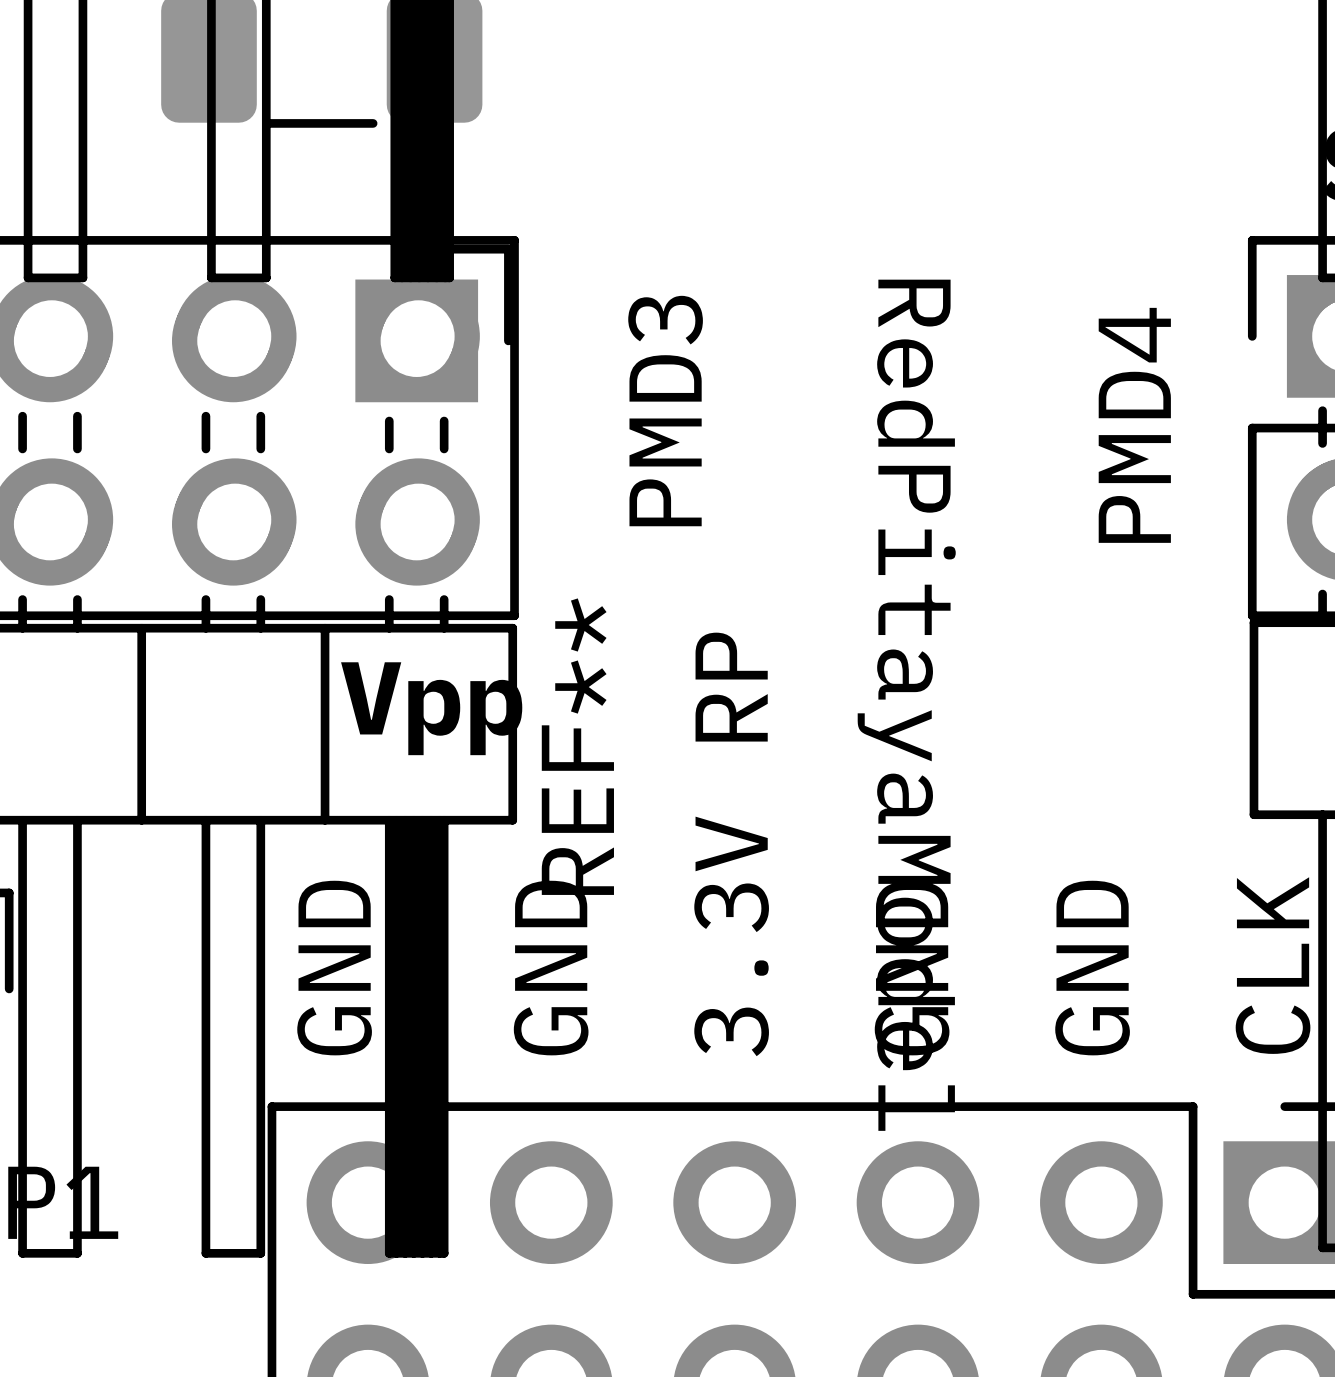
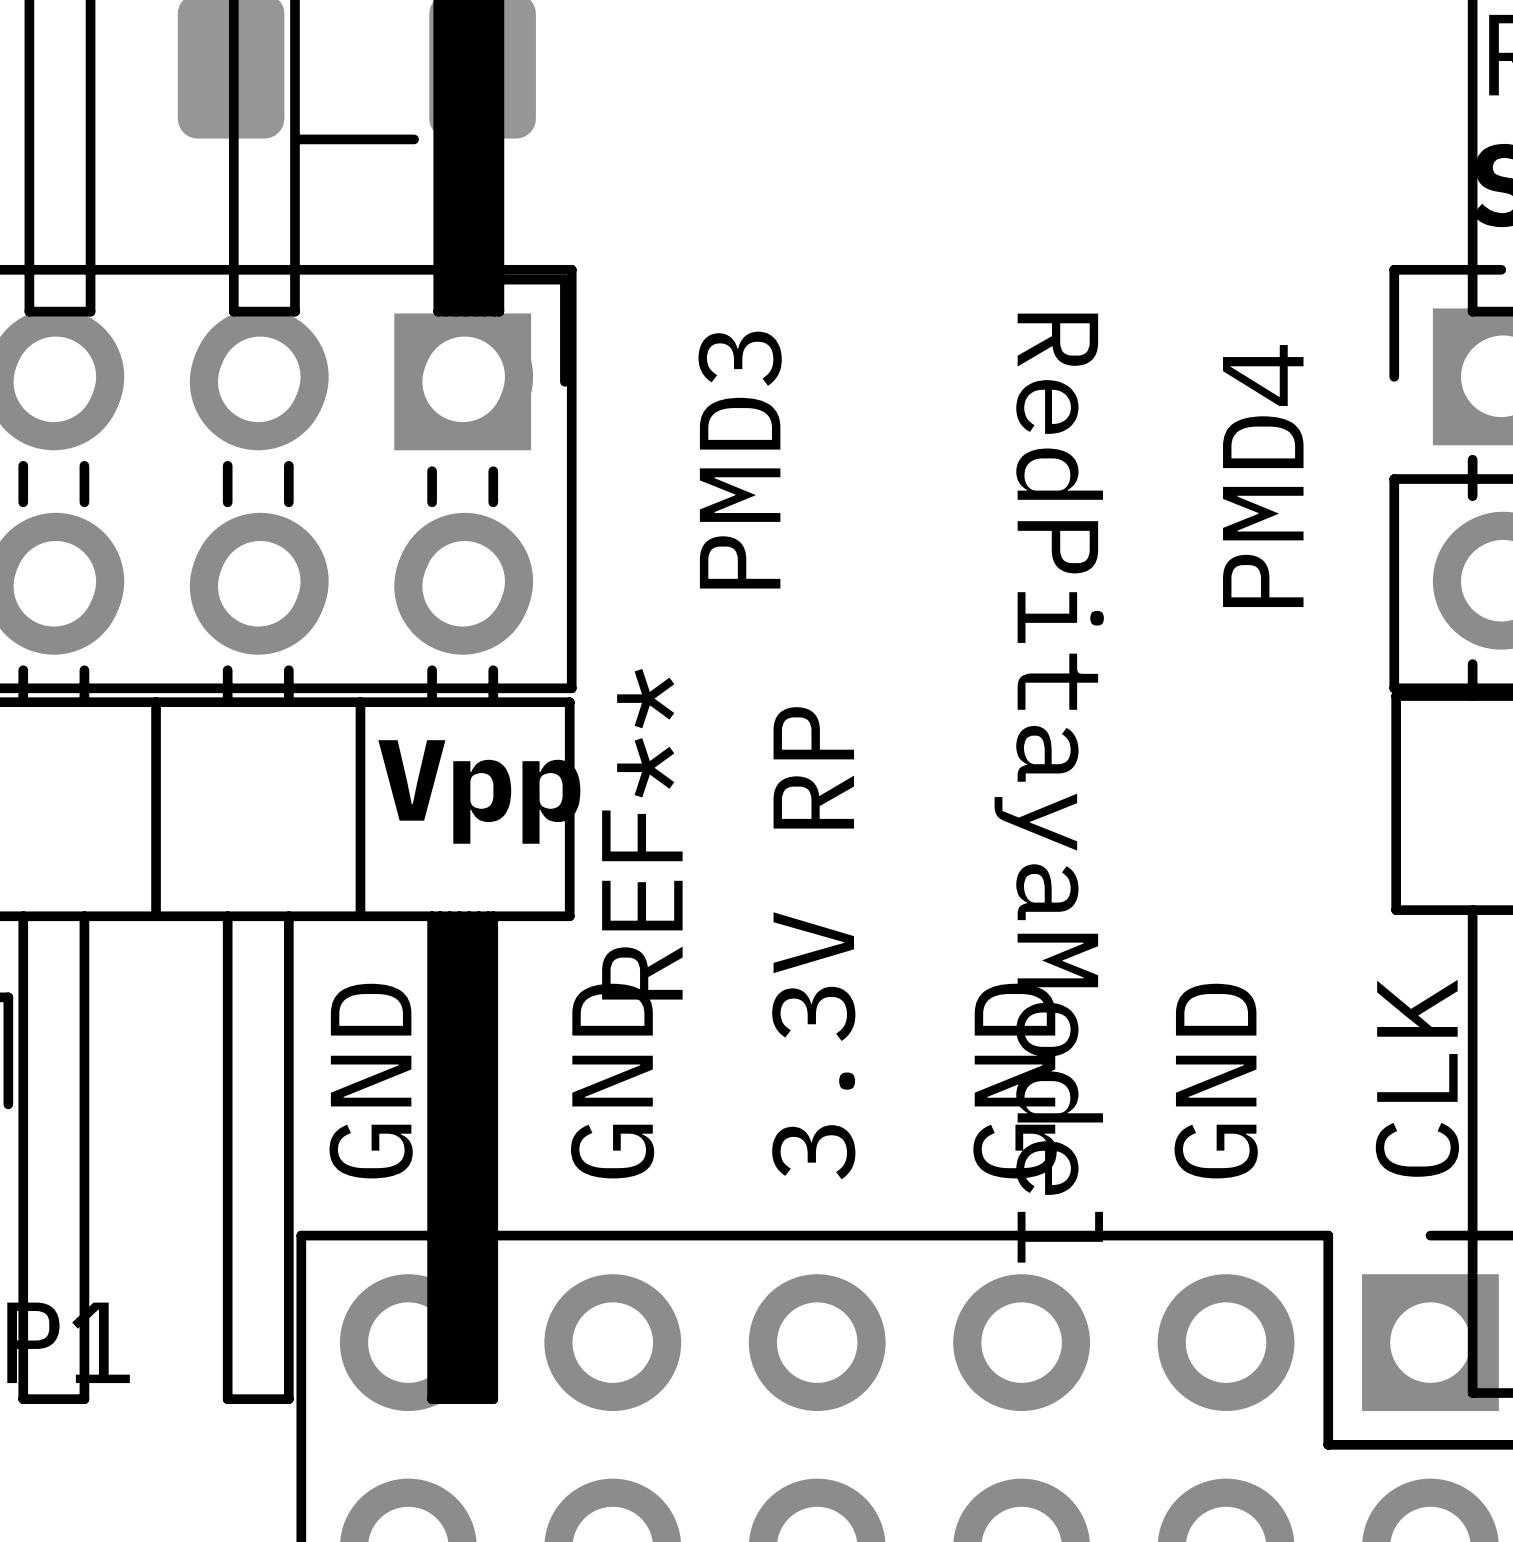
RedPitayaModel position: (906, 705) -> (1049, 788)

